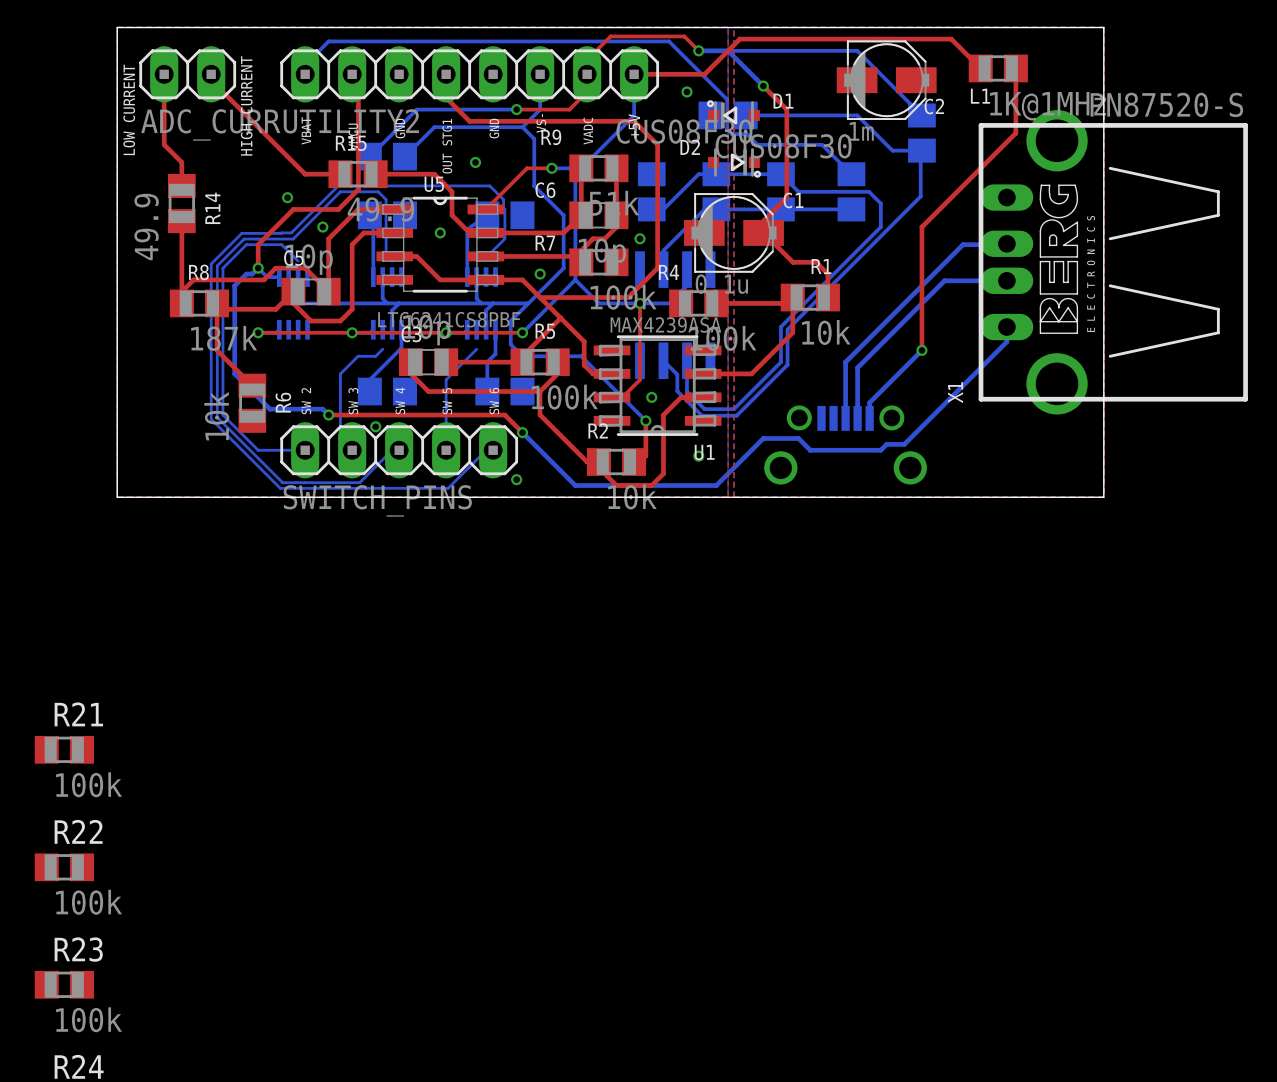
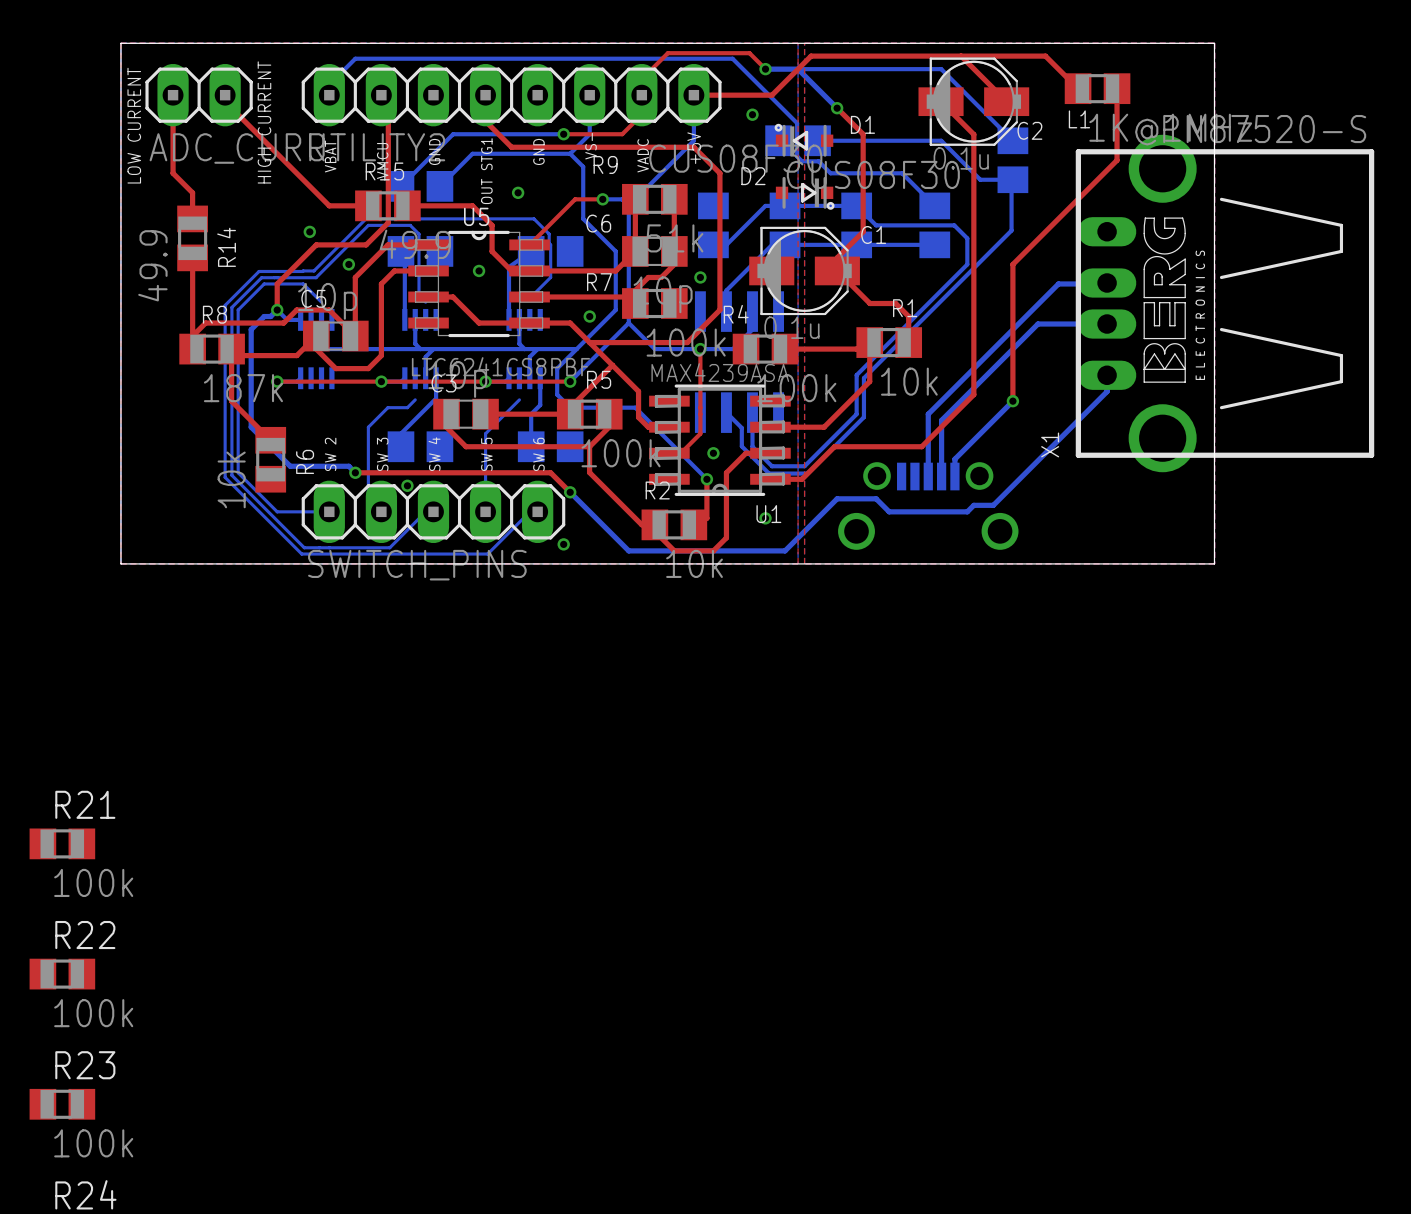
top track: none -> (961, 56) (1006, 101)
top track: none -> (941, 101) (973, 134) (973, 394) (921, 446) (834, 446) (801, 479) (770, 479)
C2 value: 1m (861, 131) -> 0.1u (961, 158)

